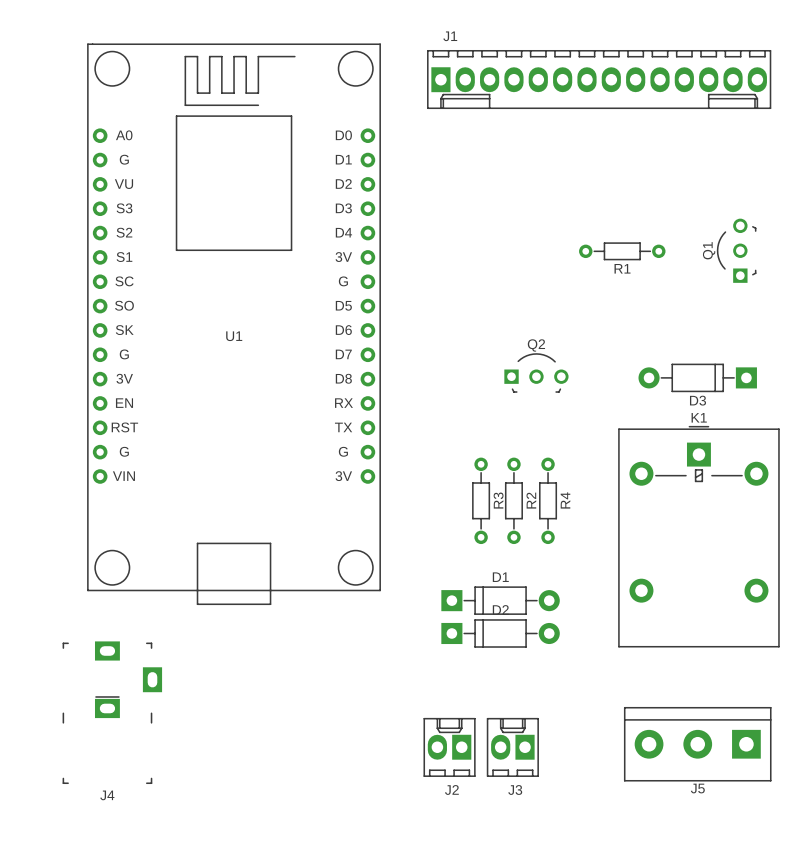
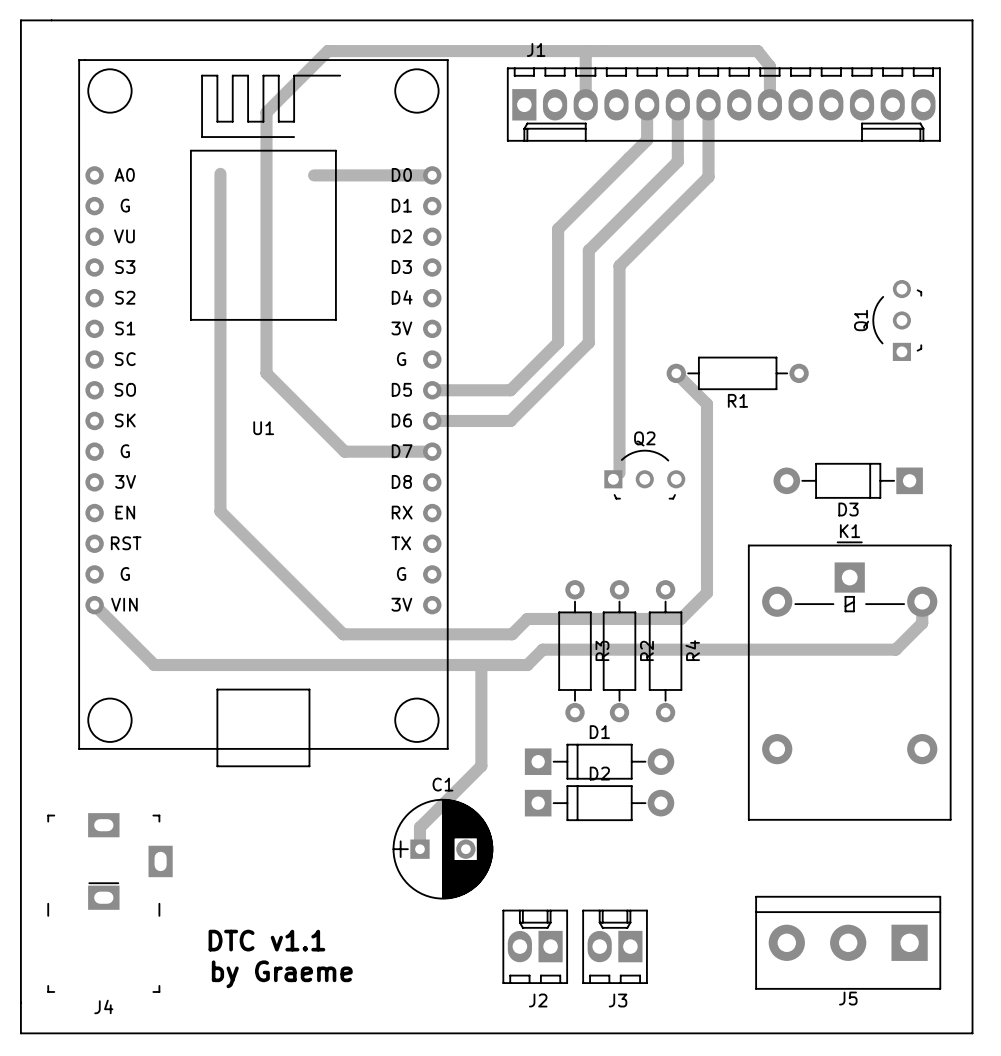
board edge: none -> (20, 20) (20, 1033) (972, 1033) (972, 20) (20, 20)
track: none -> (588, 51) (585, 54) (585, 104)
track: none -> (647, 104) (647, 140) (558, 229) (558, 342) (510, 390) (432, 390)
track: none -> (677, 104) (677, 161) (588, 250) (588, 342) (510, 420) (432, 420)
track: none -> (708, 104) (708, 176) (619, 265) (619, 473)
track: none -> (769, 104) (769, 66) (757, 51) (327, 51) (266, 112) (266, 373) (344, 451) (432, 451)
track: none -> (220, 173) (220, 511) (343, 634) (512, 634) (527, 618) (680, 618) (706, 592) (706, 404) (676, 373)
track: none -> (314, 175) (432, 175)
R1 footprint: [579, 242, 666, 261] -> [666, 356, 809, 390]
R3 footprint: [472, 457, 490, 545] -> [558, 580, 592, 723]
R2 footprint: [505, 457, 523, 545] -> [602, 580, 637, 723]
R4 footprint: [539, 457, 557, 545] -> [649, 580, 683, 723]
track: none -> (922, 601) (922, 623) (895, 649) (542, 649) (527, 665) (154, 665) (94, 605)
track: none -> (481, 665) (481, 766) (419, 827) (419, 849)
C1: none -> (442, 849)
text: none -> DTC v1.1 (266, 940)
text: none -> by Graeme (282, 974)

